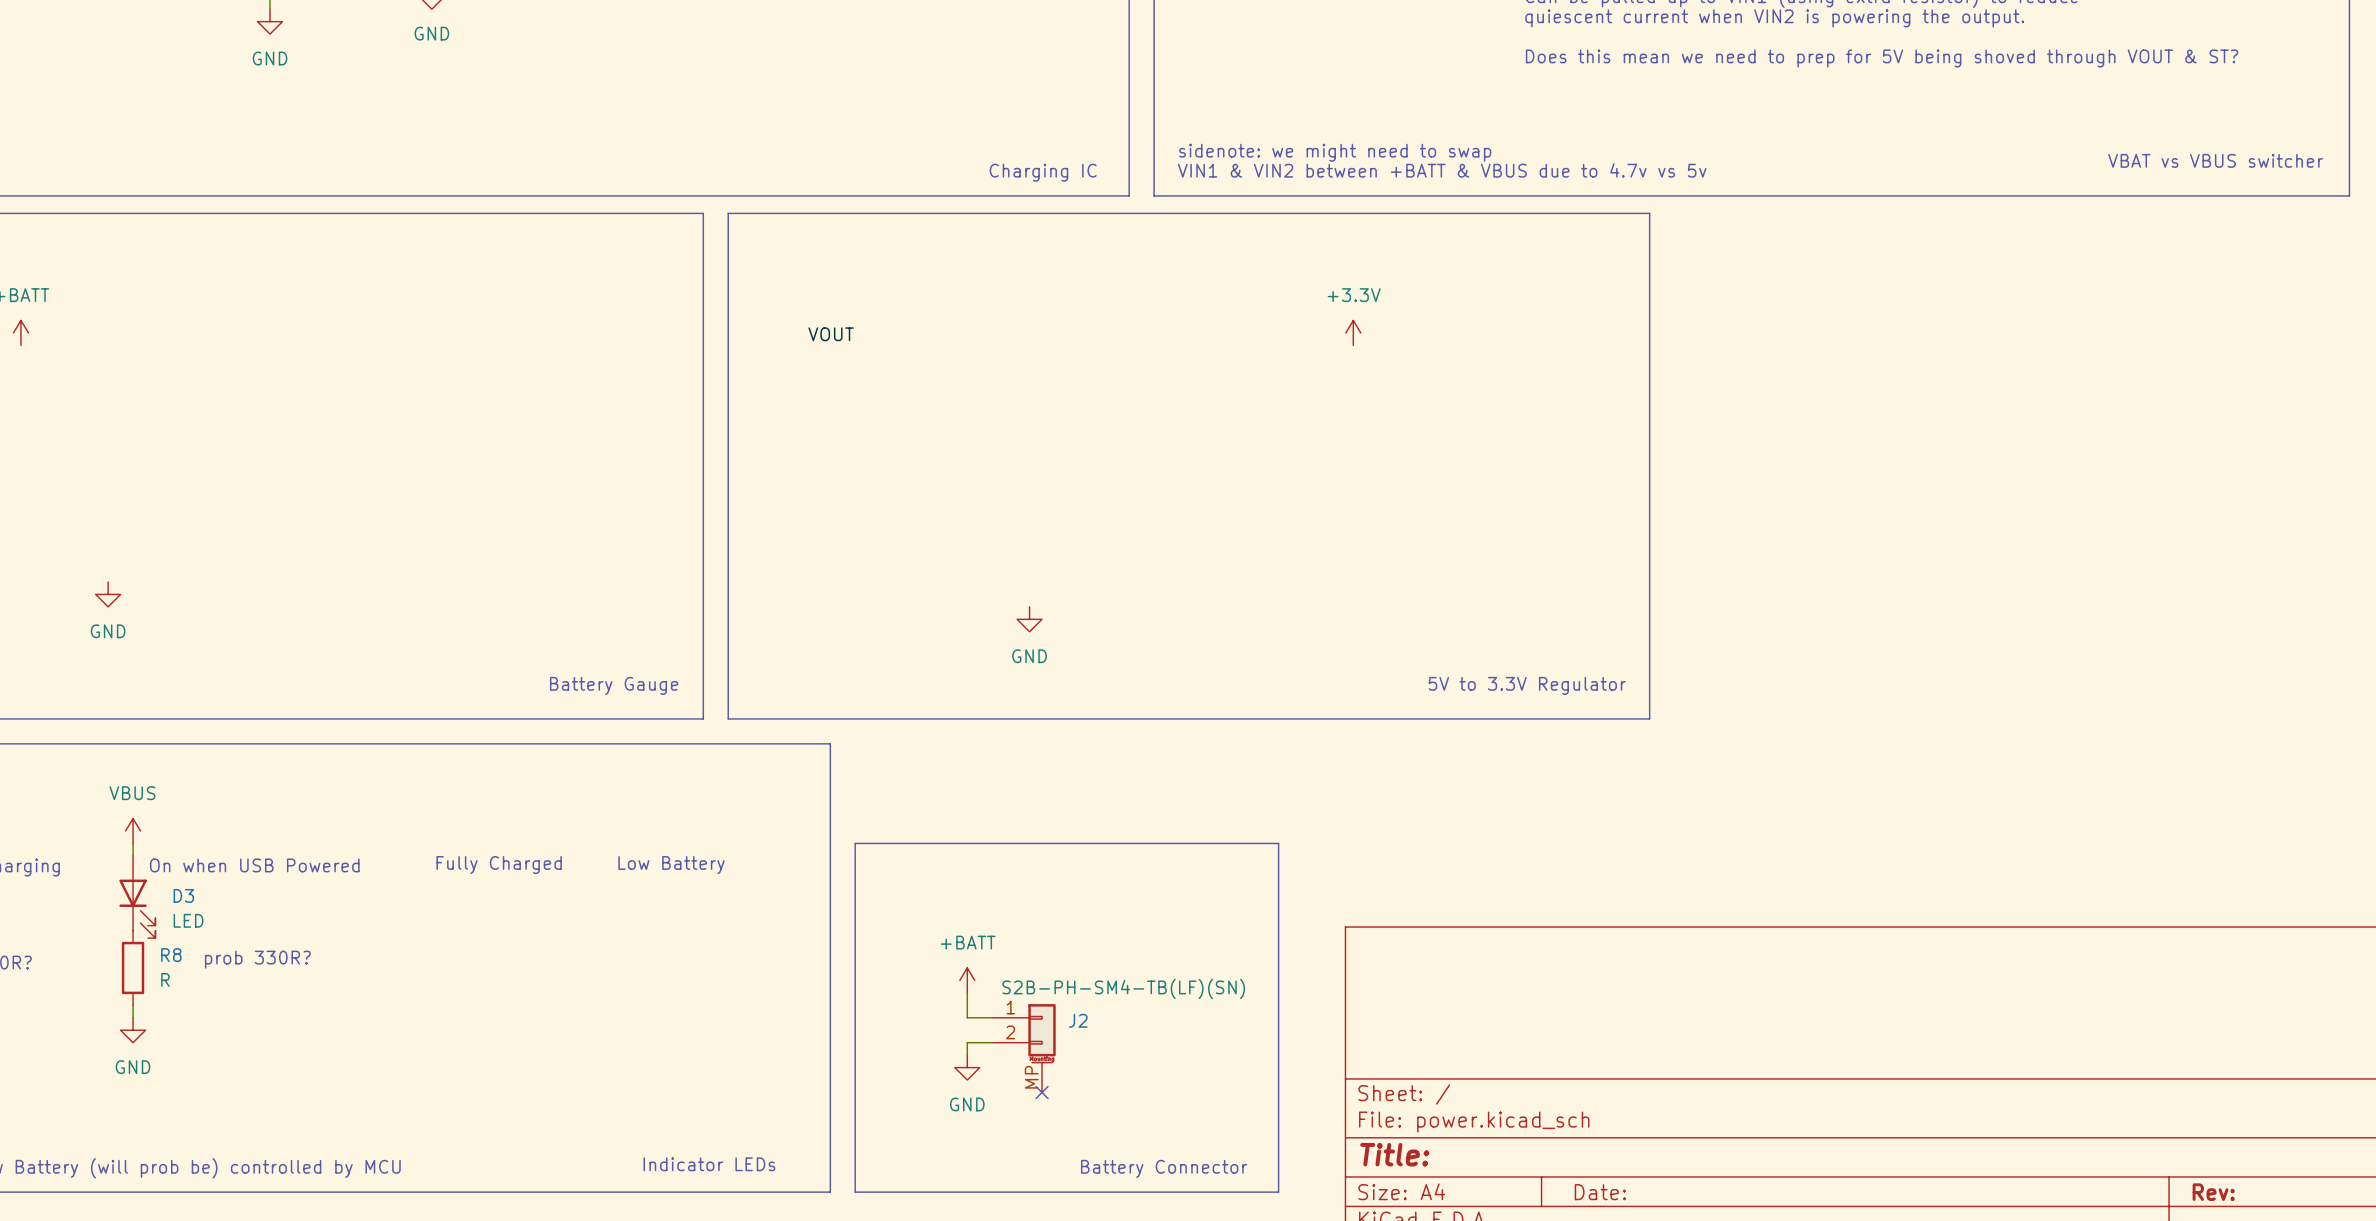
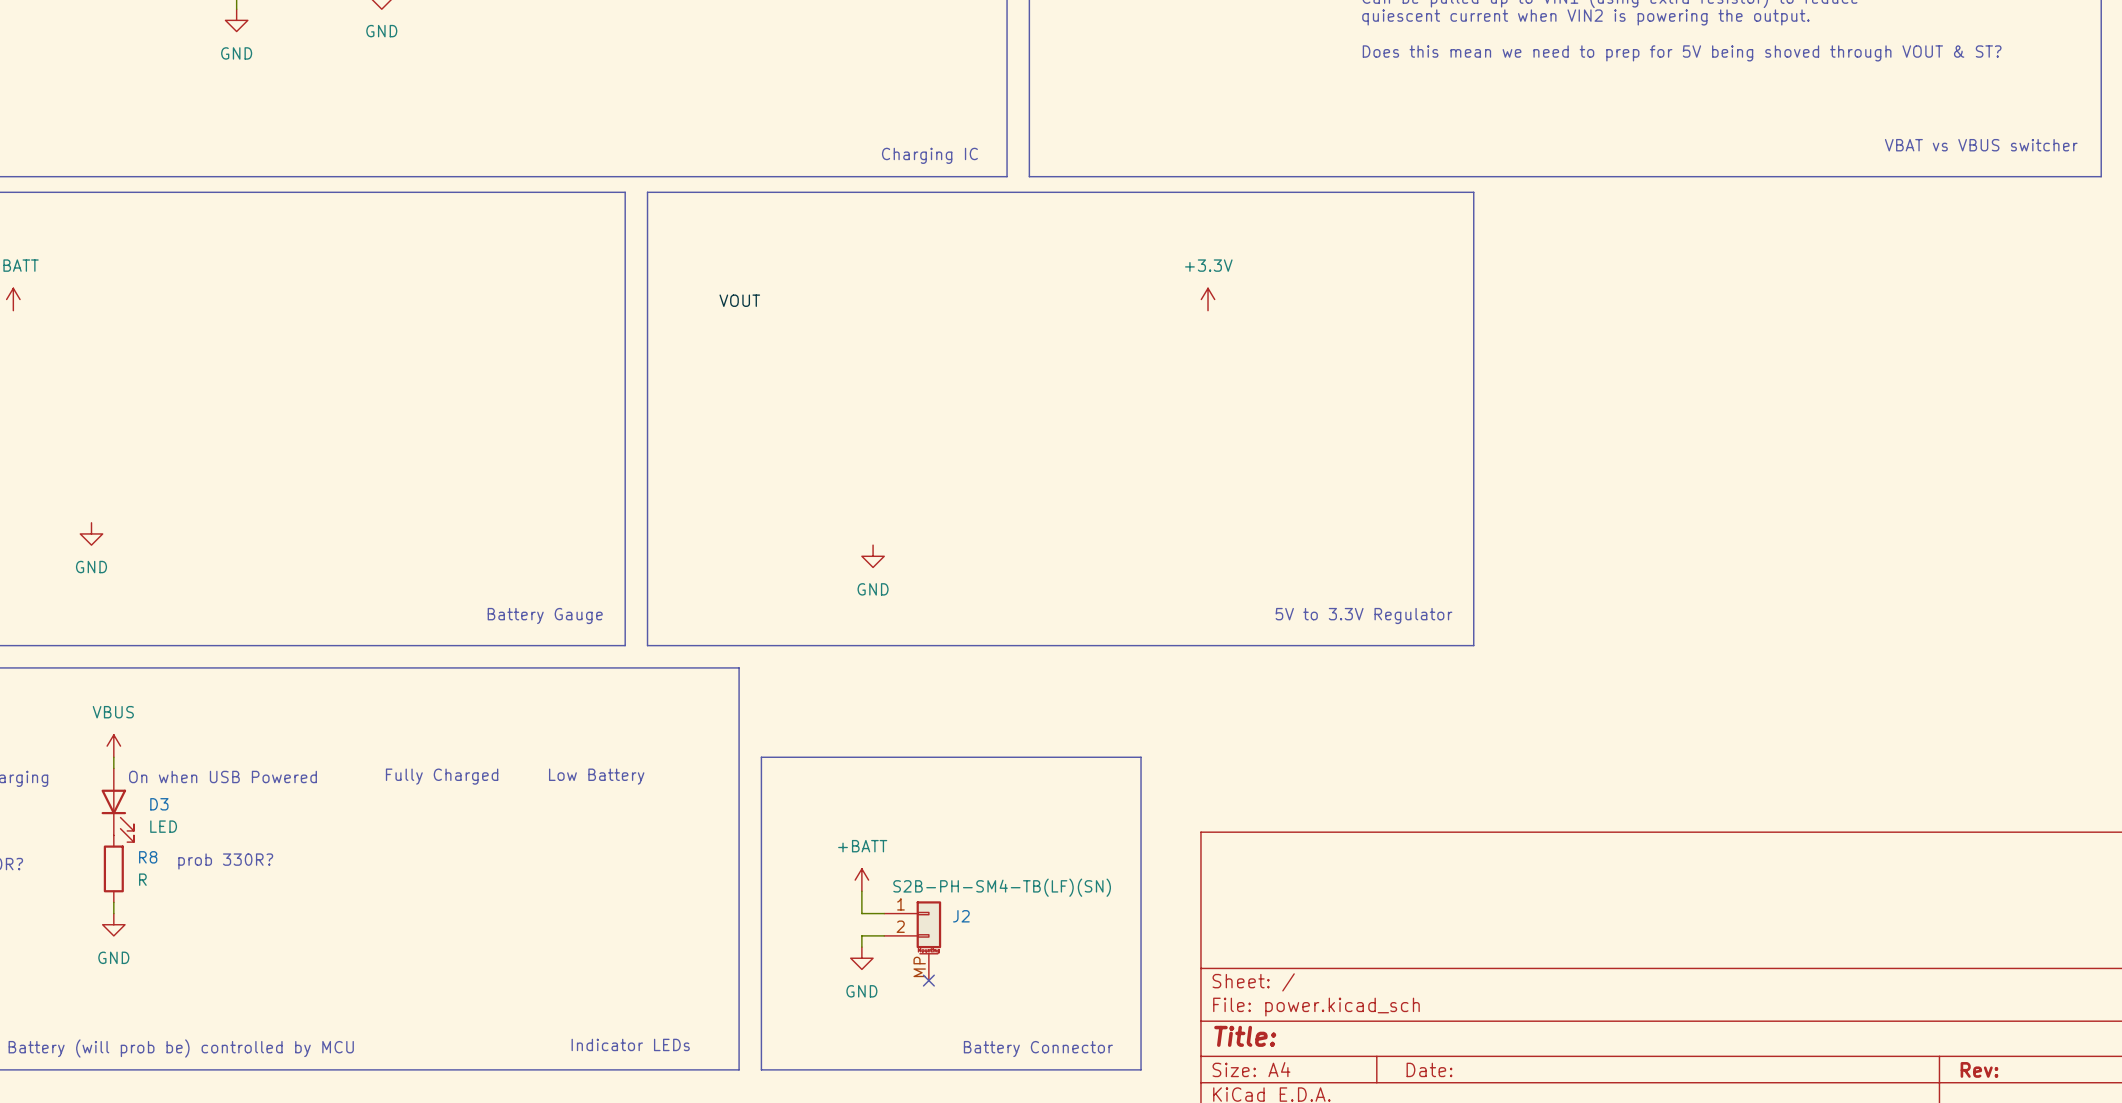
text: sidenote: we might need to swap (1335, 152) -> none
text: VIN1 & VIN2 between +BATT & VBUS due to 4.7v vs 5v (1442, 170) -> none
power symbol position: GND (1029, 619) -> GND (873, 556)

